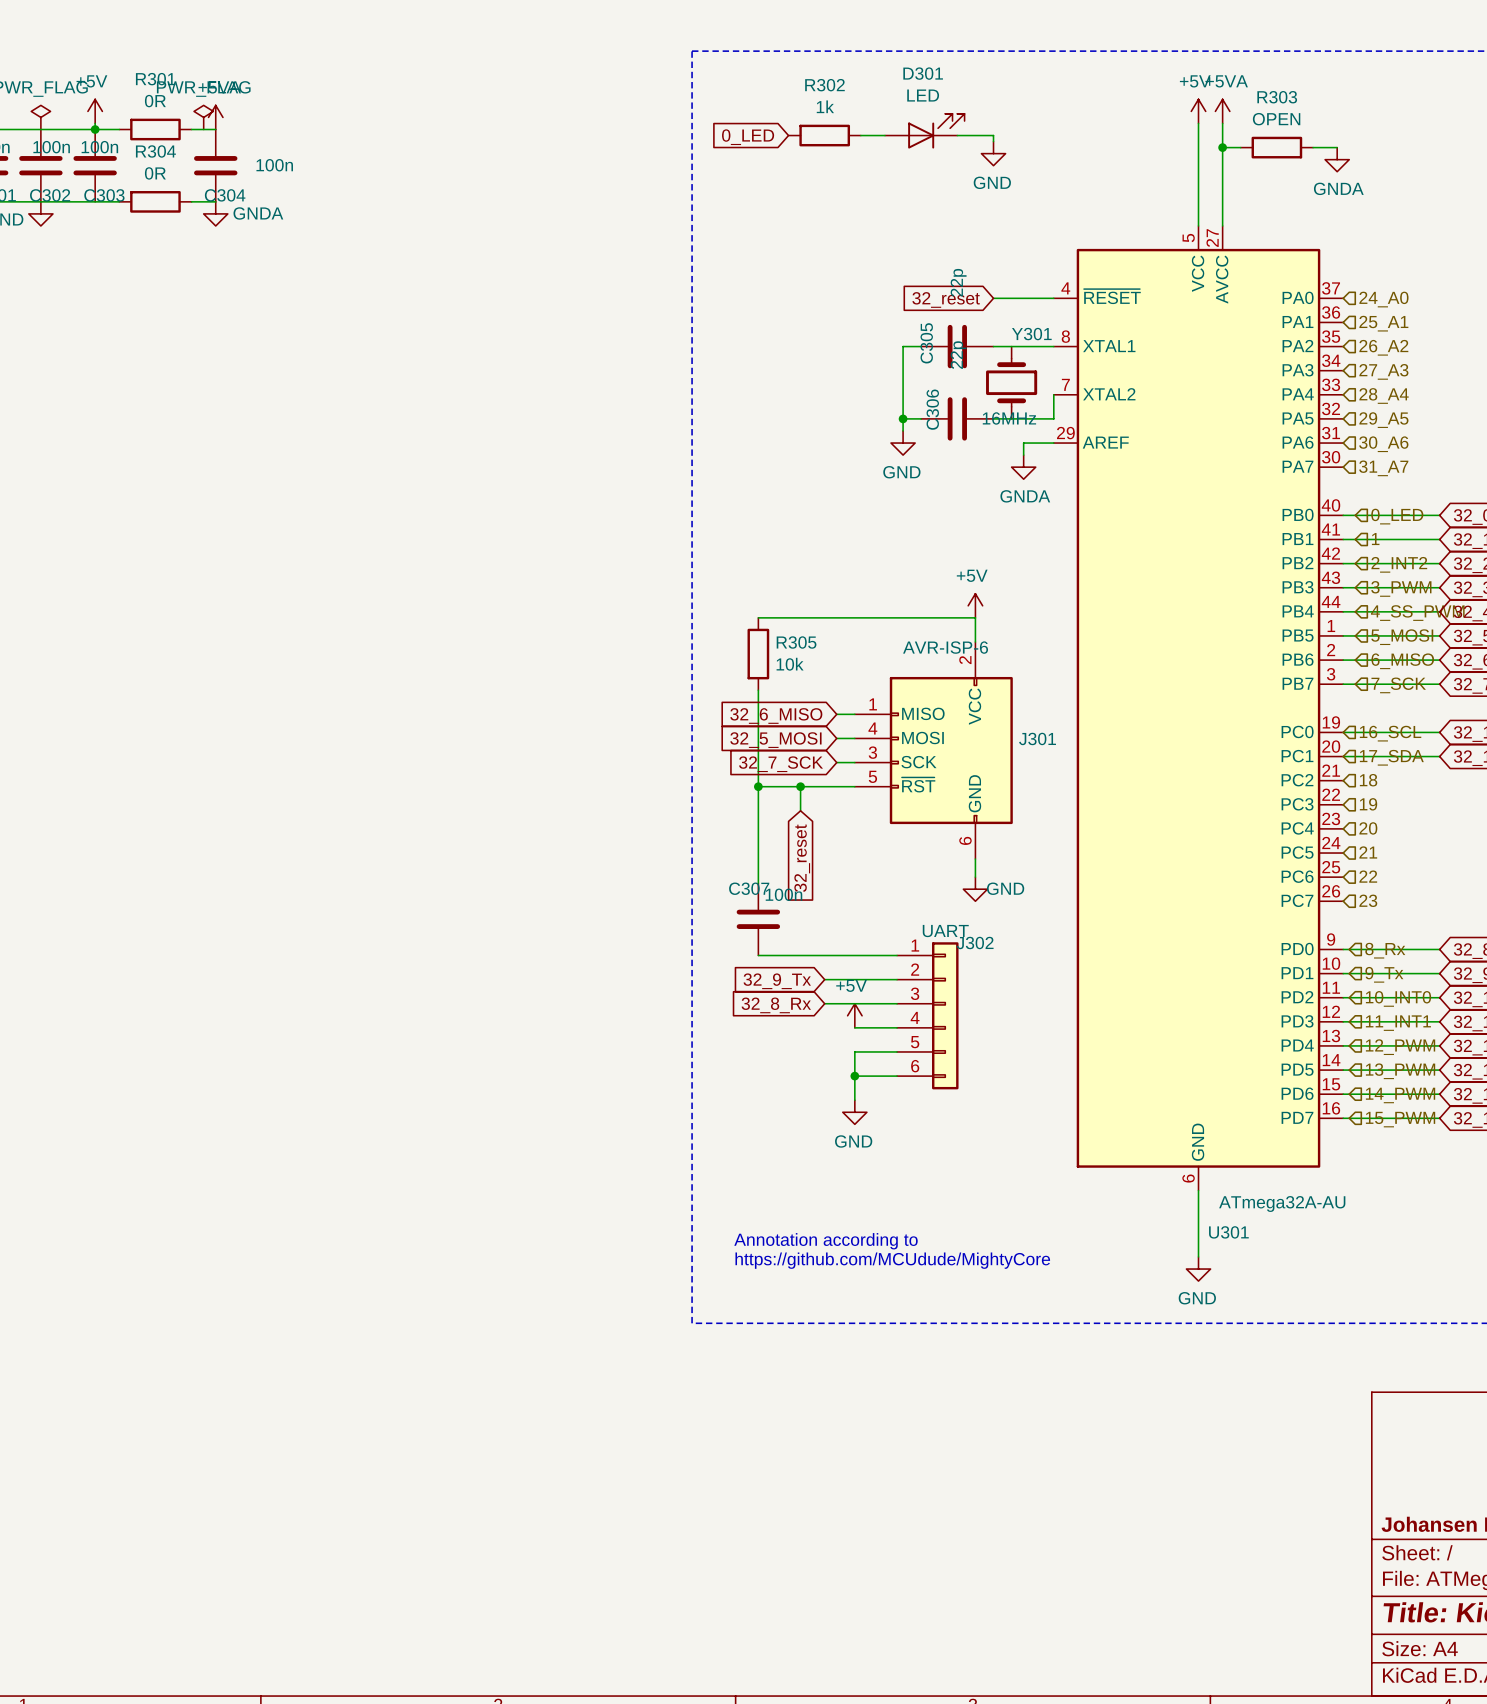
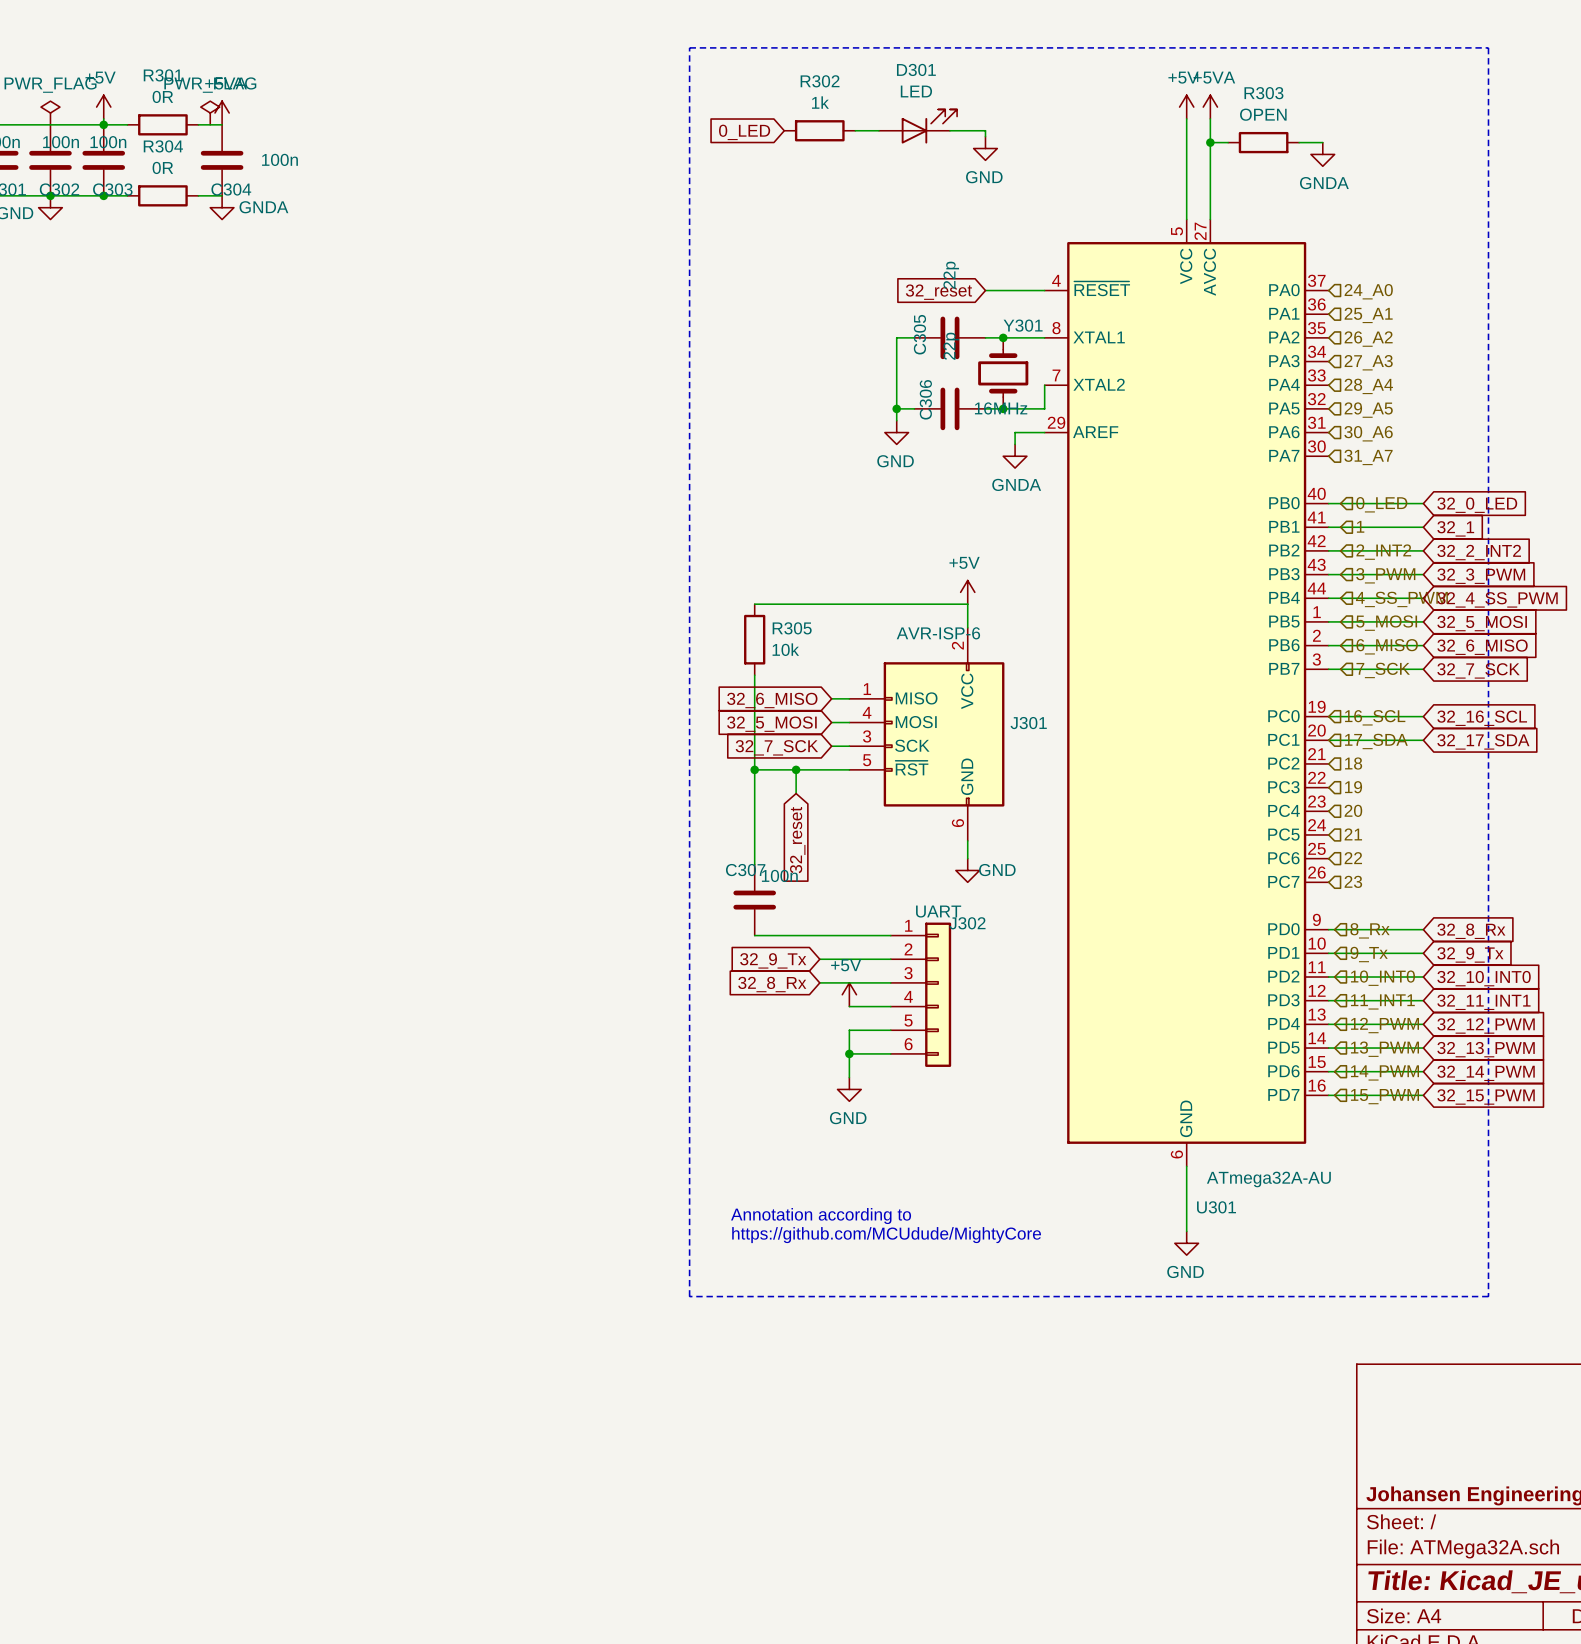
junction: none -> (50, 195)
junction: none -> (103, 195)
junction: none -> (1003, 337)
junction: none -> (1003, 408)

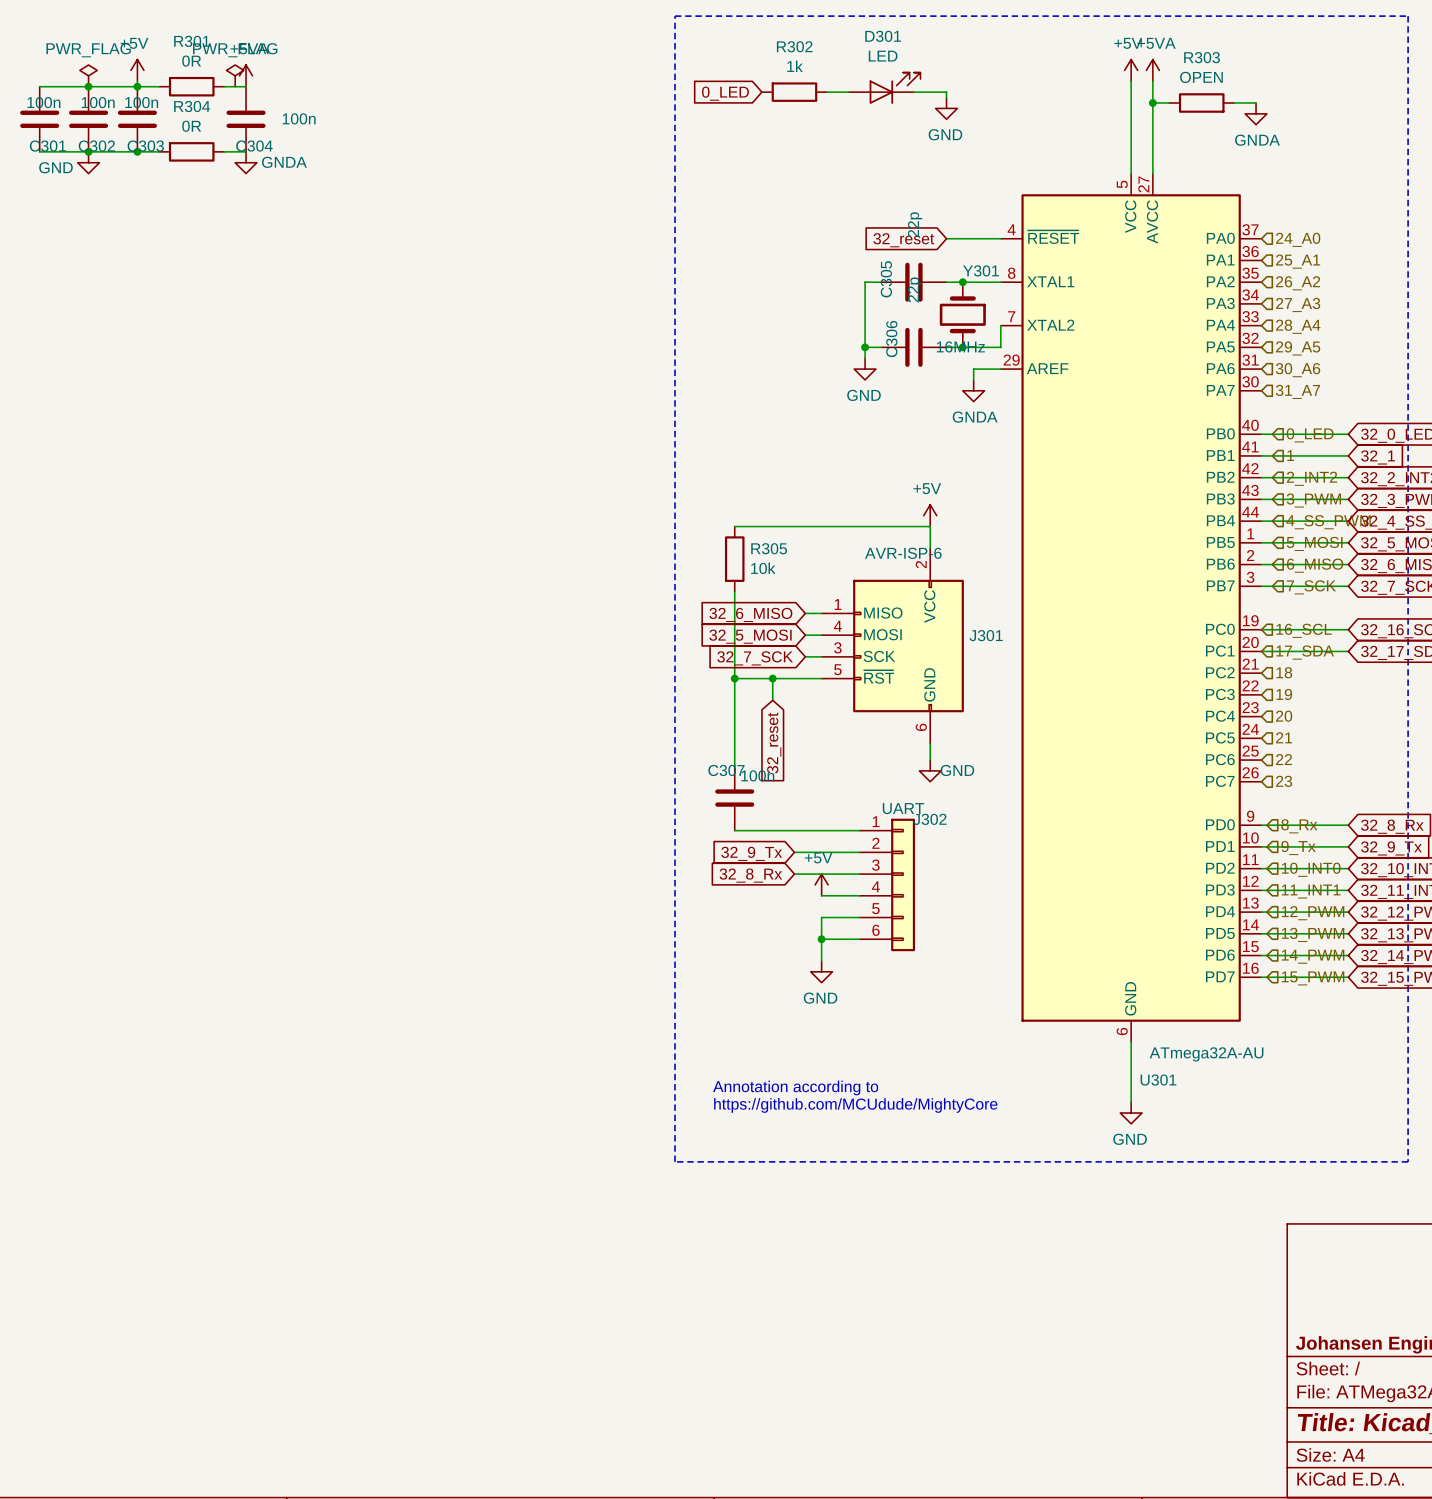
junction: none -> (88, 86)

